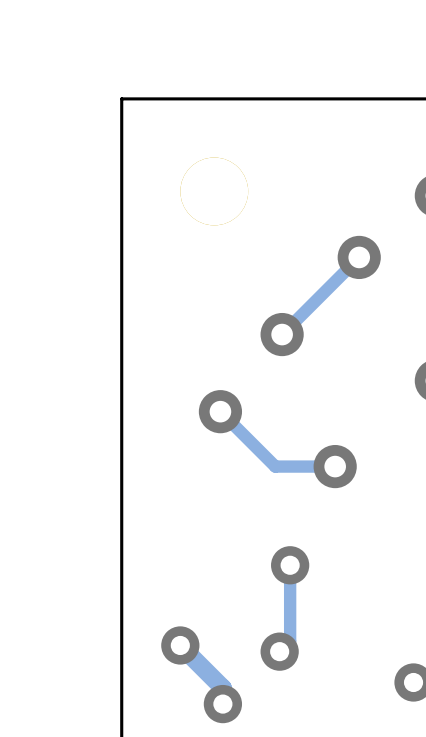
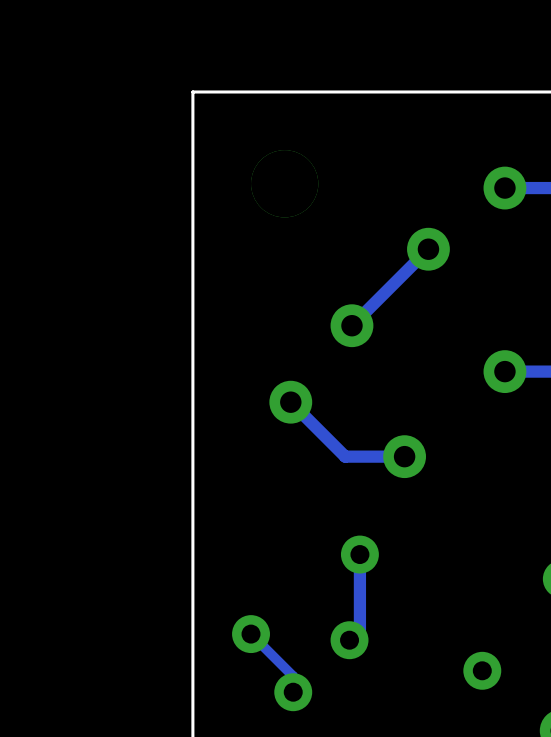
track width: thick (180, 645) (222, 688) (222, 704) -> thin (251, 634) (293, 676) (293, 692)

